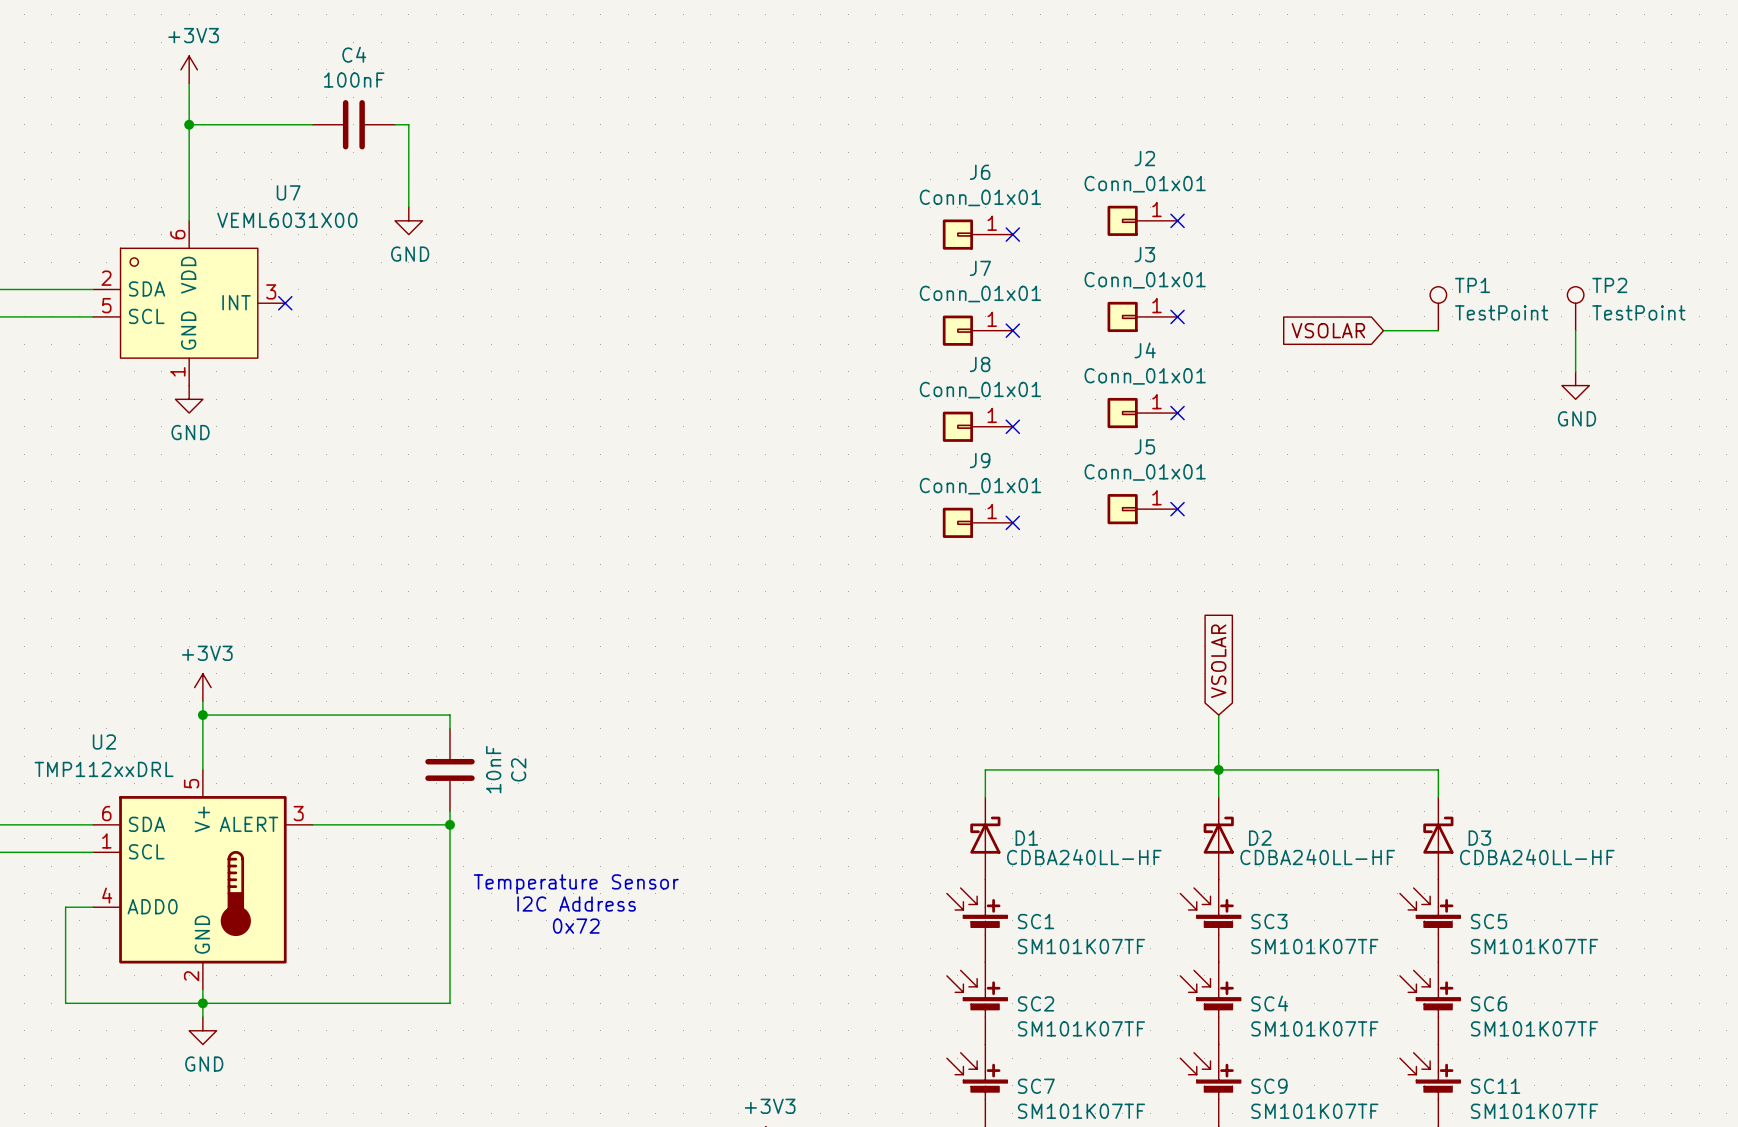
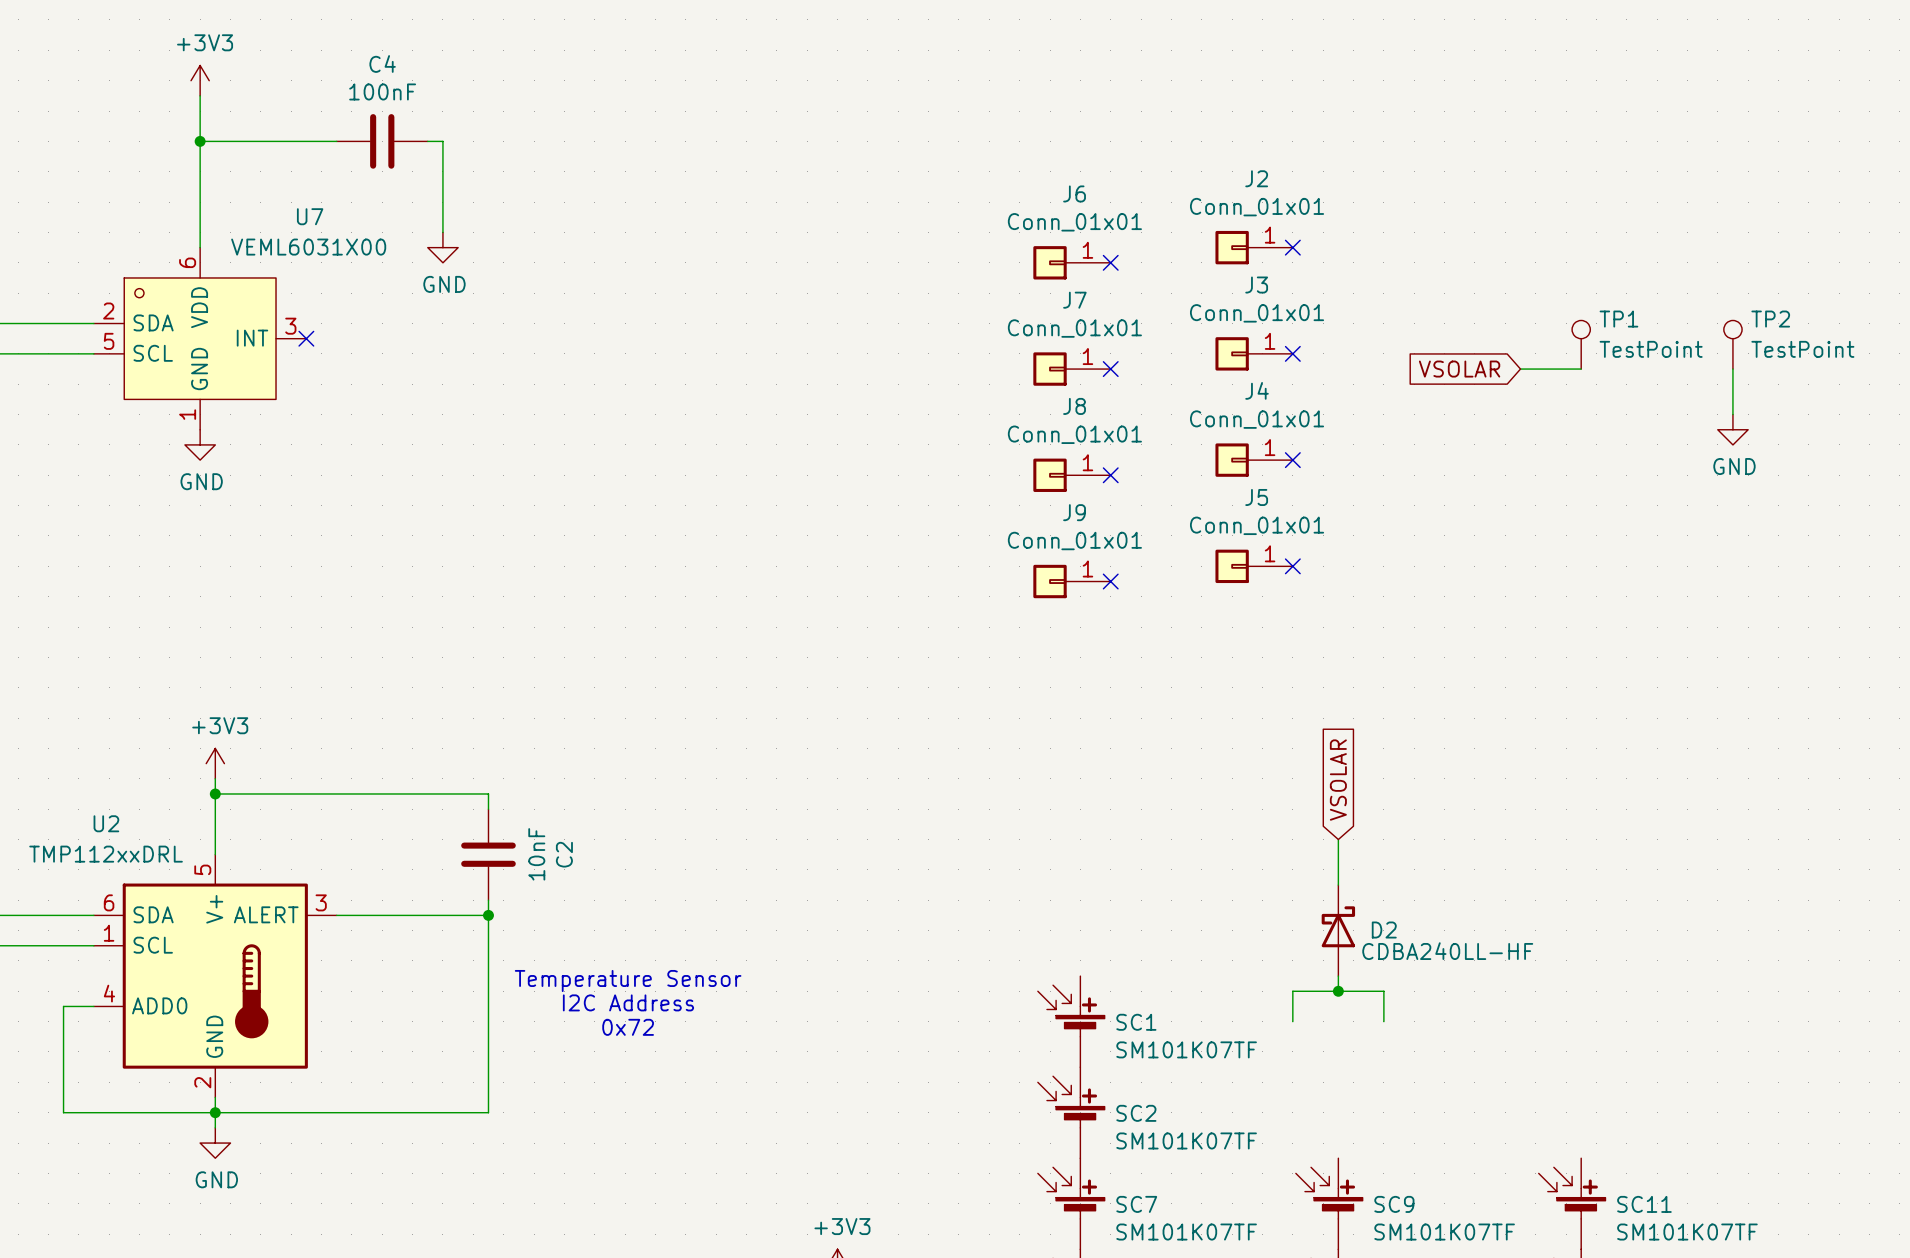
global label position: VSOLAR (1218, 661) -> VSOLAR (1338, 780)
wire: (1218, 715) (1218, 756) -> none
junction: (1218, 769) -> none
wire: (985, 797) (985, 769) (1438, 769) (1438, 797) -> none
D1: CDBA240LL-HF (985, 838) -> none
D3: CDBA240LL-HF (1438, 838) -> none
junction: none -> (1338, 991)
wire: none -> (1292, 1021) (1292, 991) (1383, 991) (1383, 1021)
SC3: SM101K07TF (1210, 920) -> none
SC5: SM101K07TF (1430, 920) -> none
SC4: SM101K07TF (1210, 1003) -> none
SC6: SM101K07TF (1430, 1003) -> none

